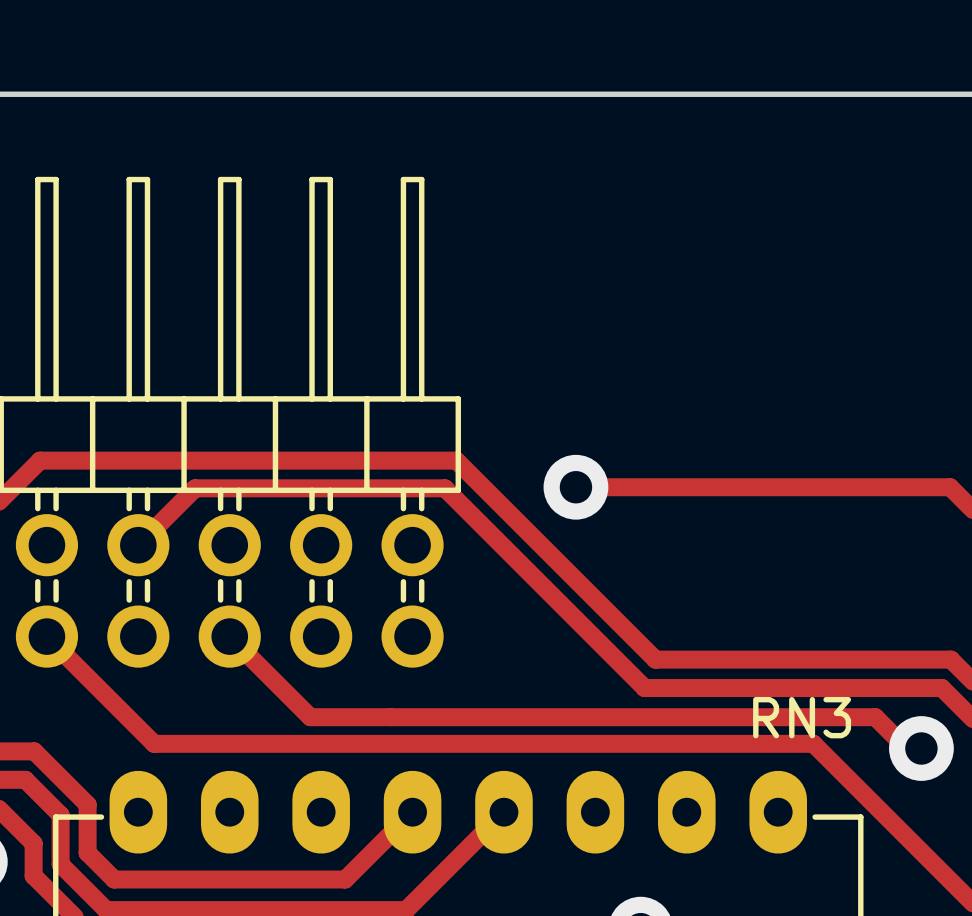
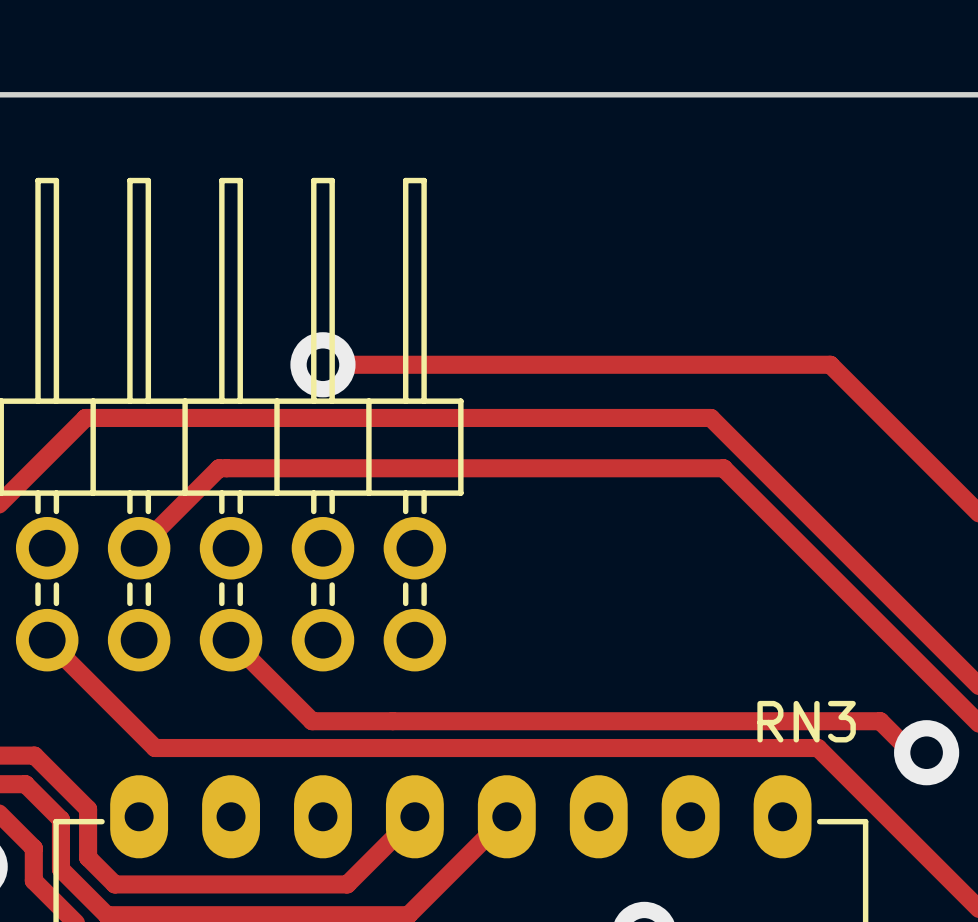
via: none -> (322, 364)
track: (40, 460) (456, 460) (655, 659) (950, 659) -> (40, 463) (85, 417) (710, 417) (956, 663)
track: (575, 487) (950, 487) -> (322, 364) (830, 364) (955, 489)
via: (575, 487) -> none
track: (195, 488) (444, 488) (644, 688) (941, 688) -> (196, 491) (219, 468) (723, 468) (947, 691)

